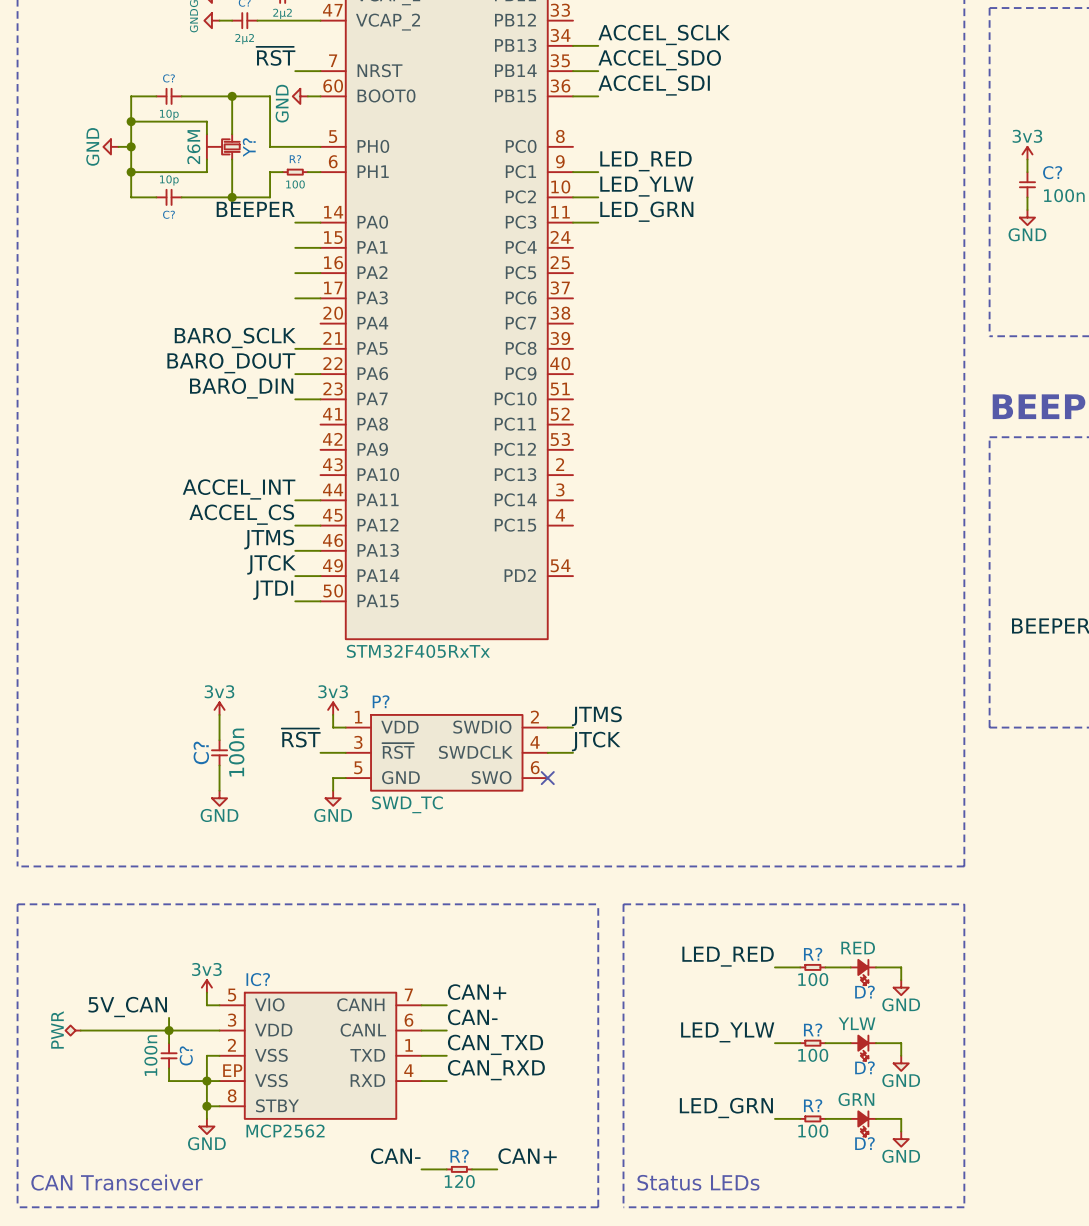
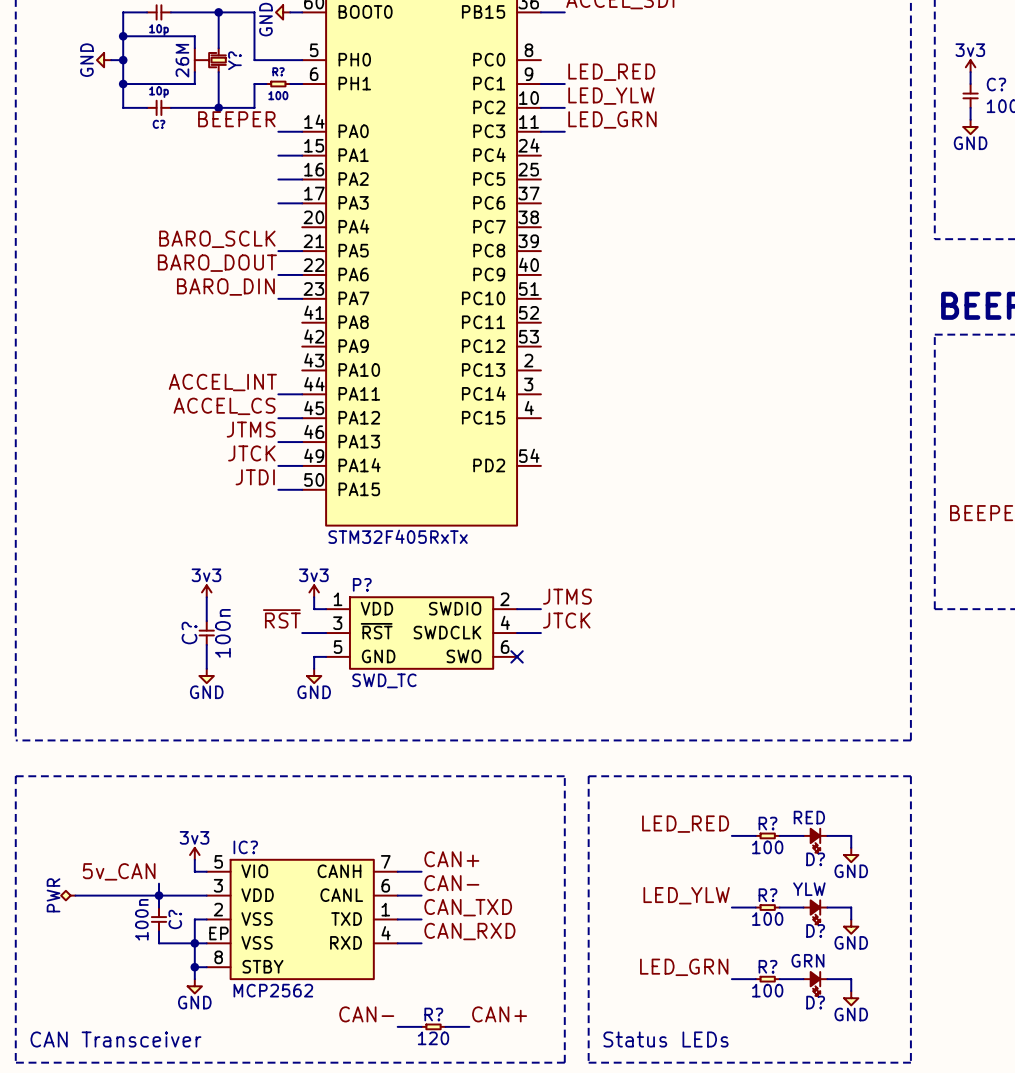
label: 5V_CAN (127, 1007) -> 5v_CAN (119, 871)

